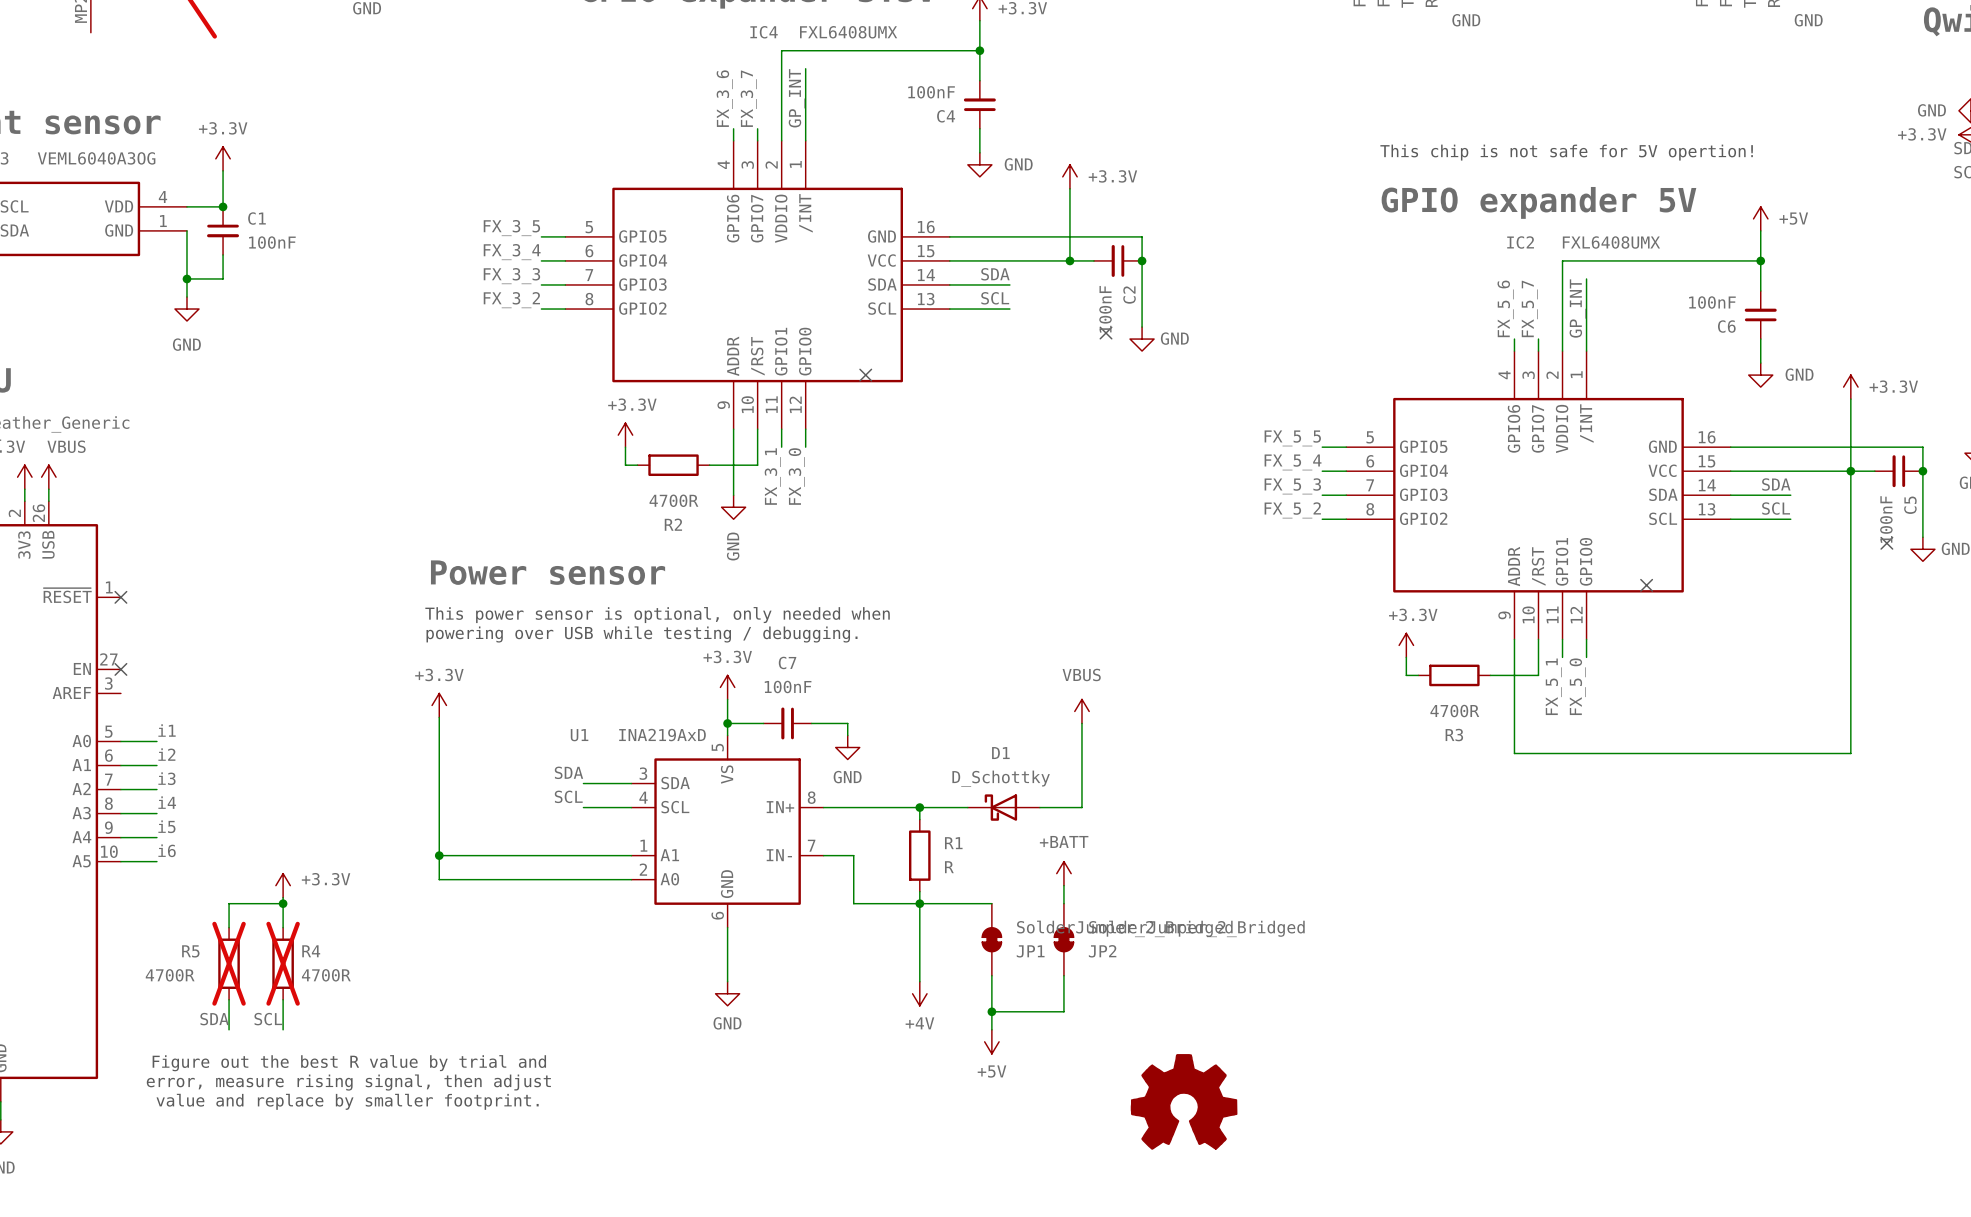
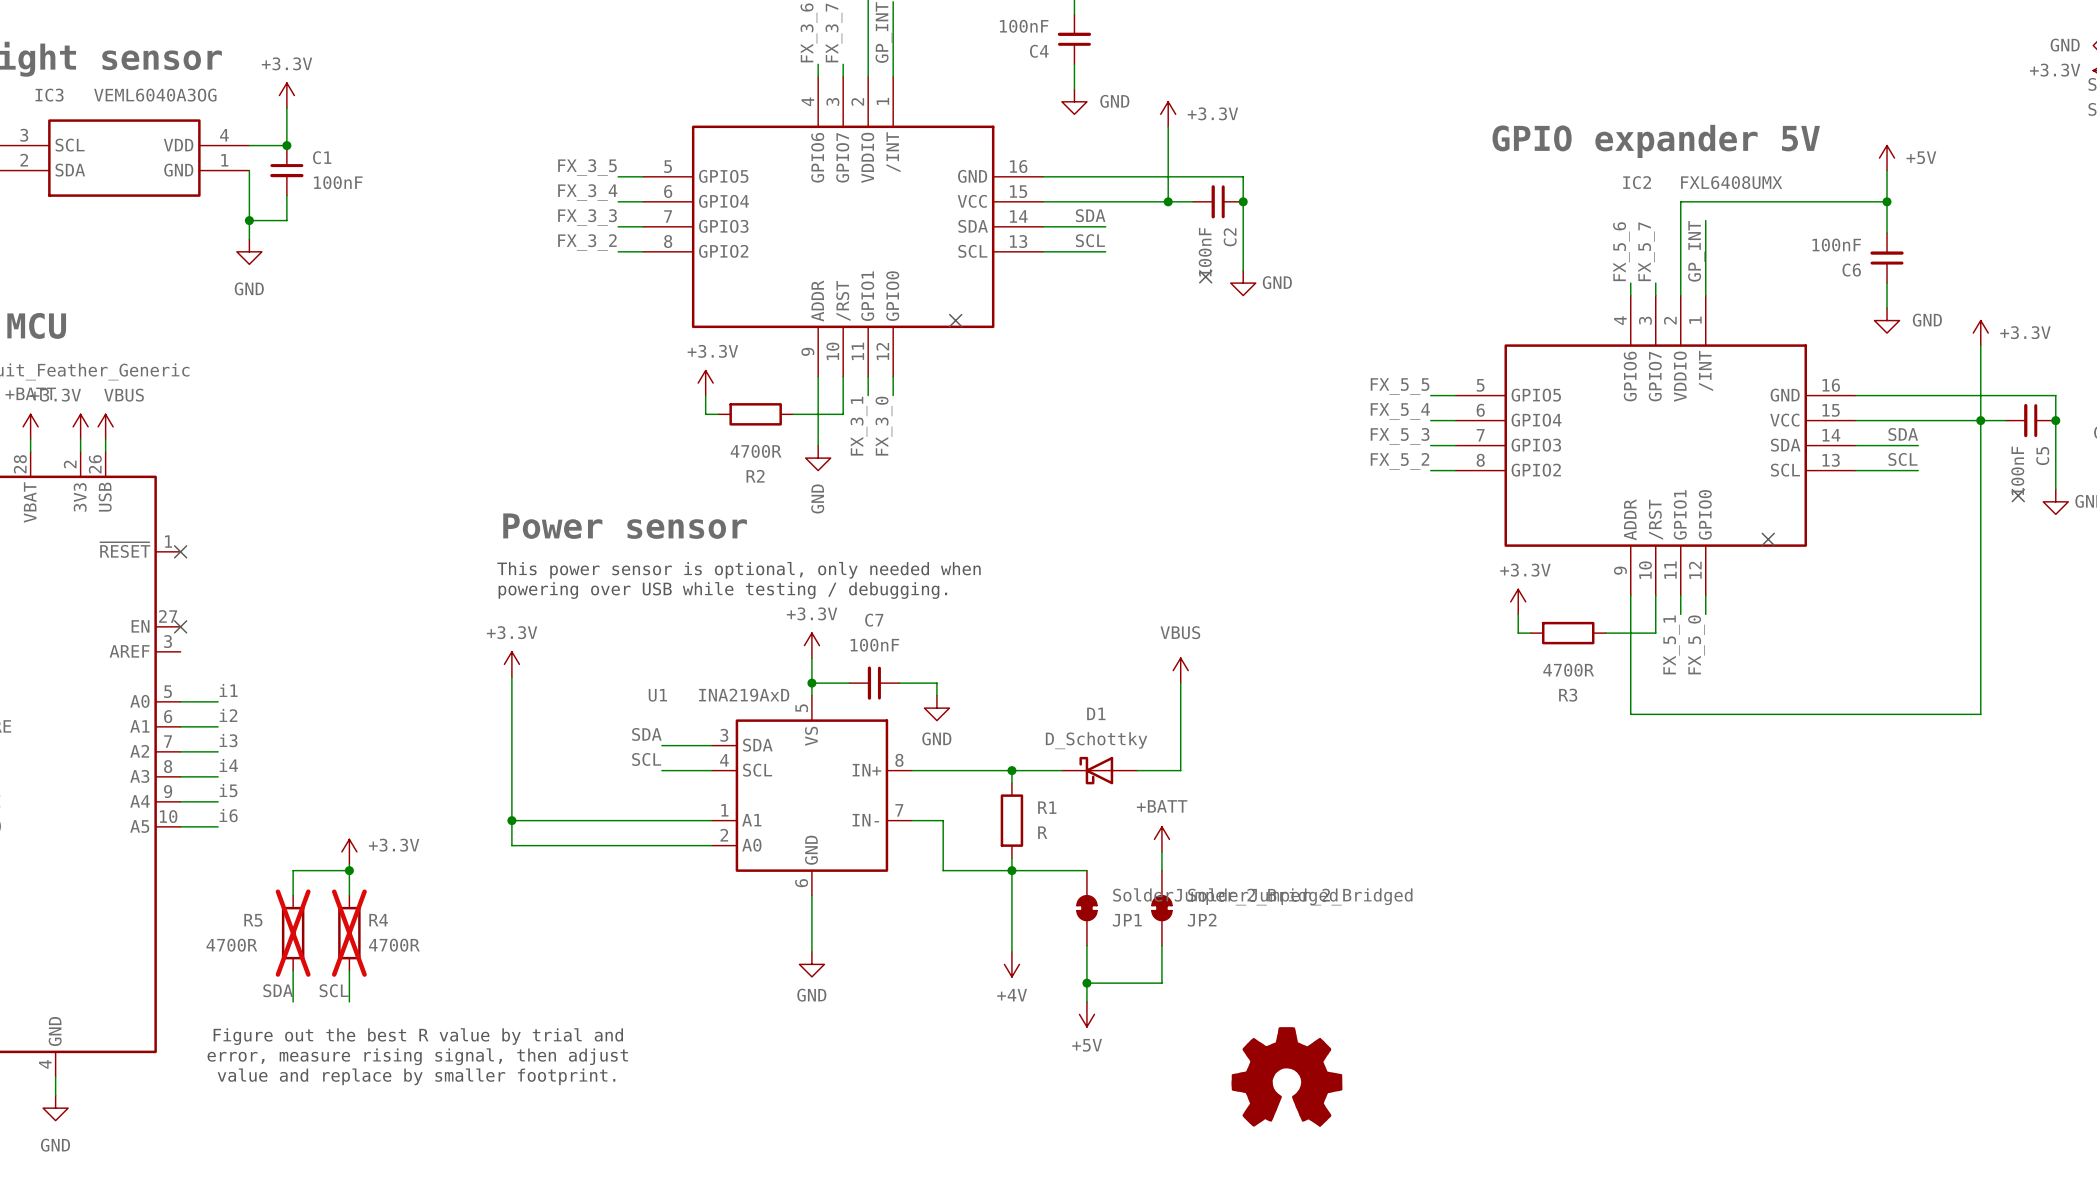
text: This chip is not safe for 5V opertion! (1566, 152) -> none

